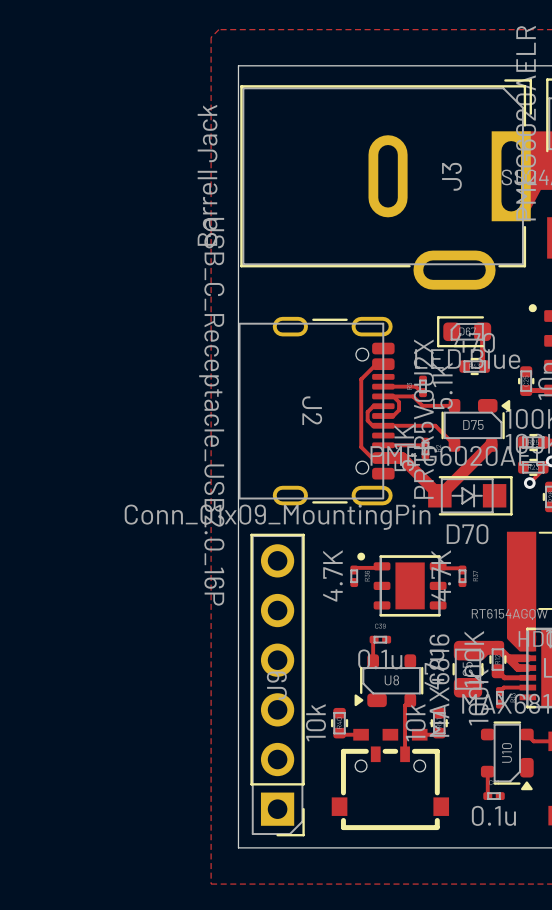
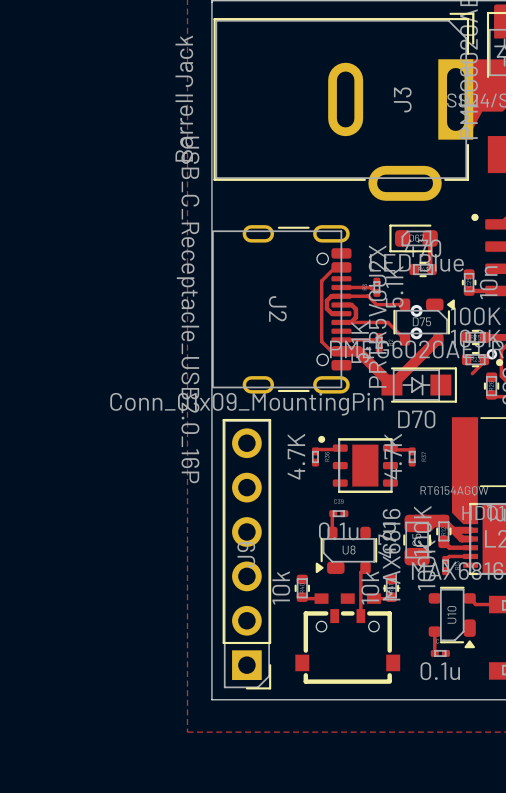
track: (393, 396) (399, 402) (399, 410) (393, 415) (383, 415) -> (341, 296) (331, 296) (326, 300) (326, 308) (331, 313) (341, 313)
track: (383, 406) (373, 406) (367, 412) (367, 420) (372, 425) (383, 425) -> (341, 304) (351, 304) (355, 309) (355, 317) (350, 322)
via: none -> (416, 310)
via: none -> (416, 333)
via: (529, 483) -> none

